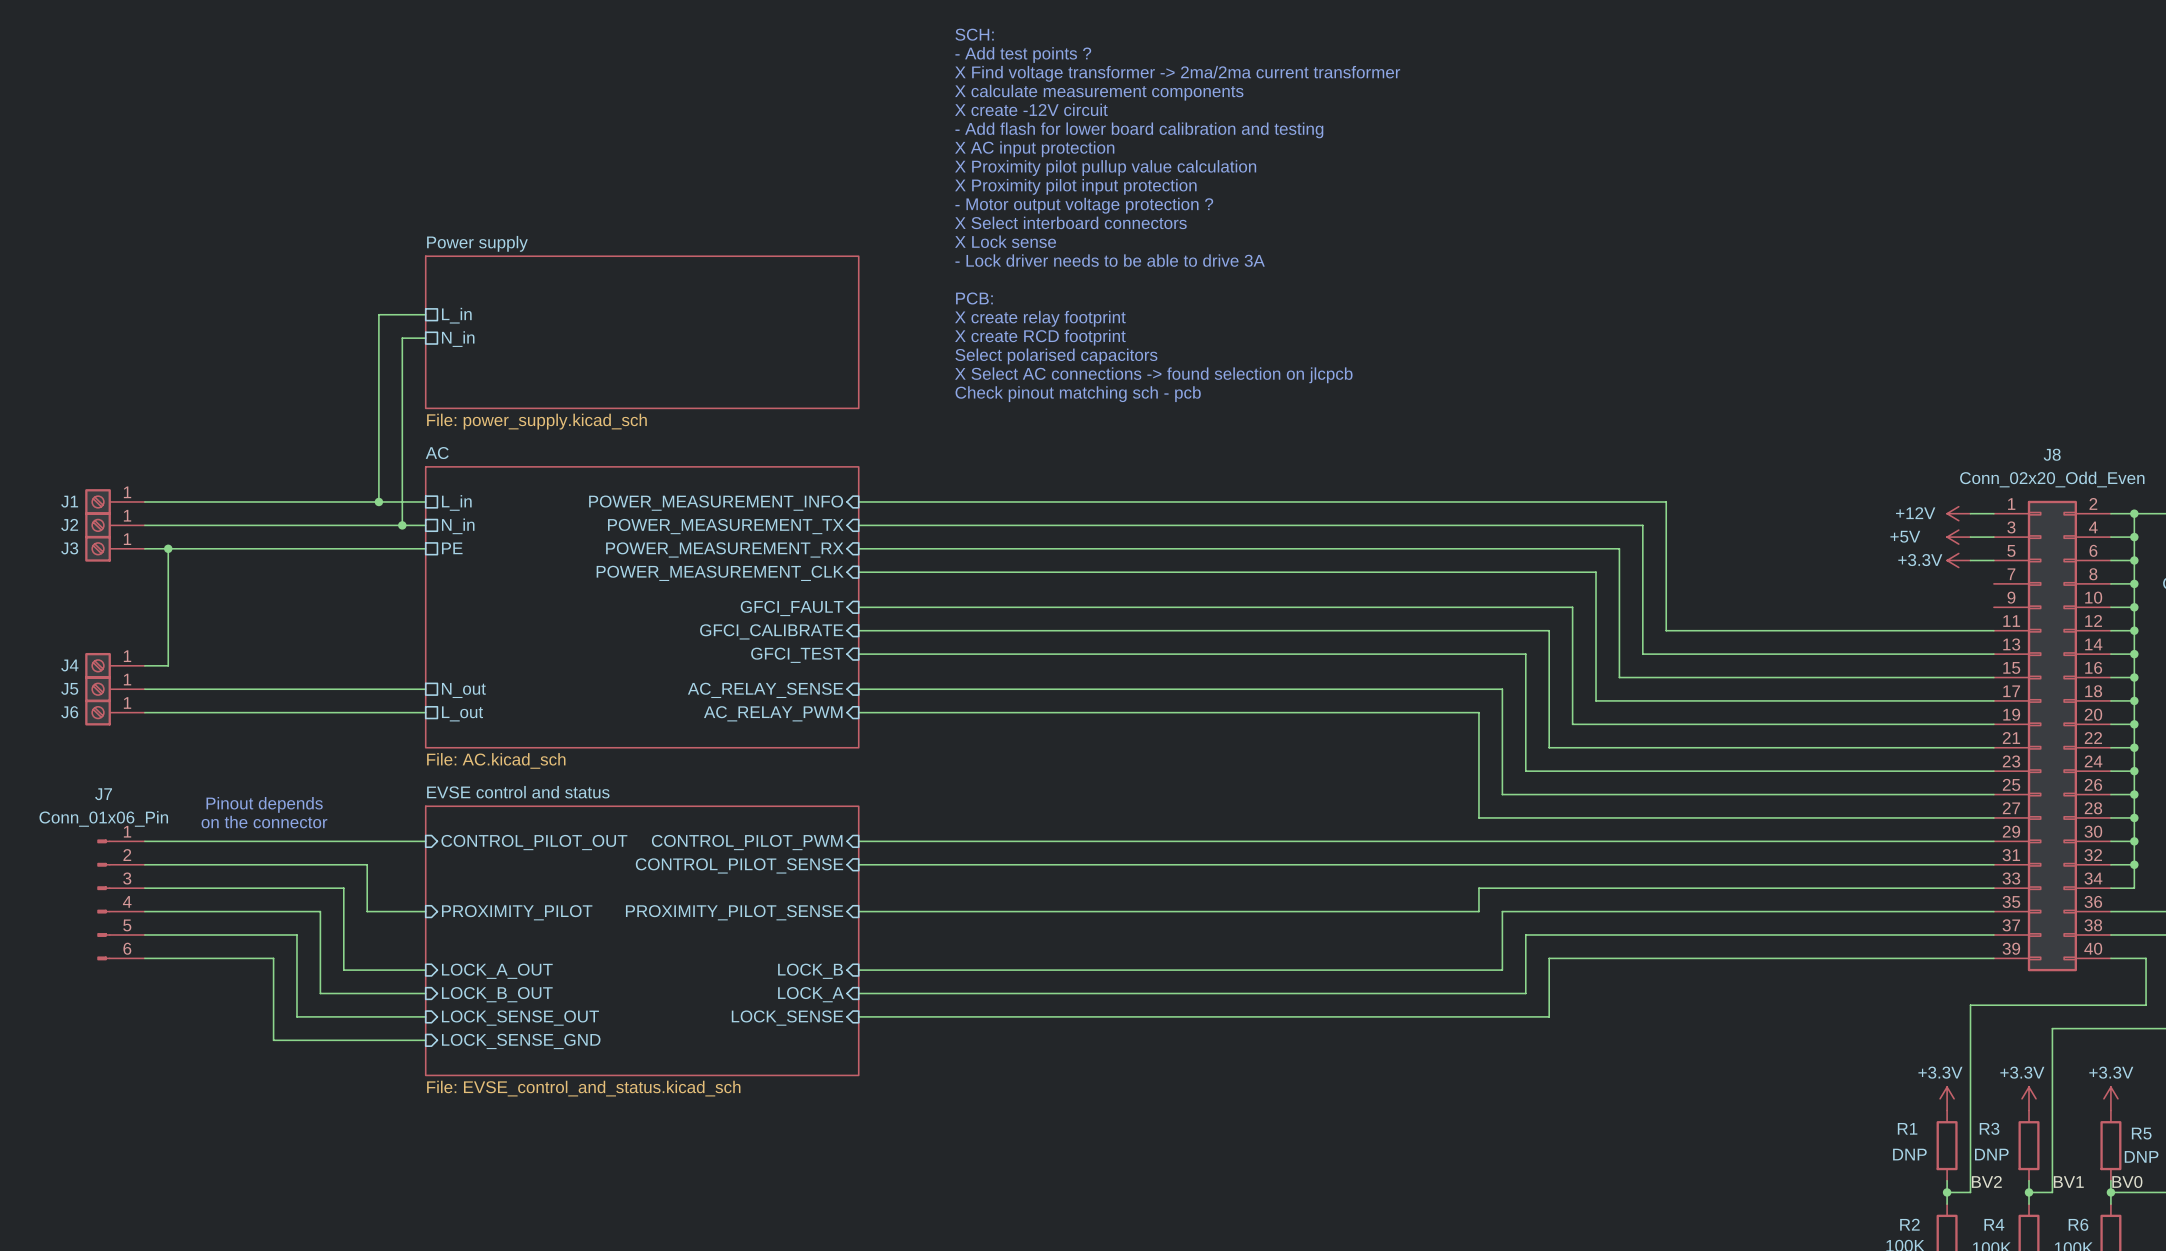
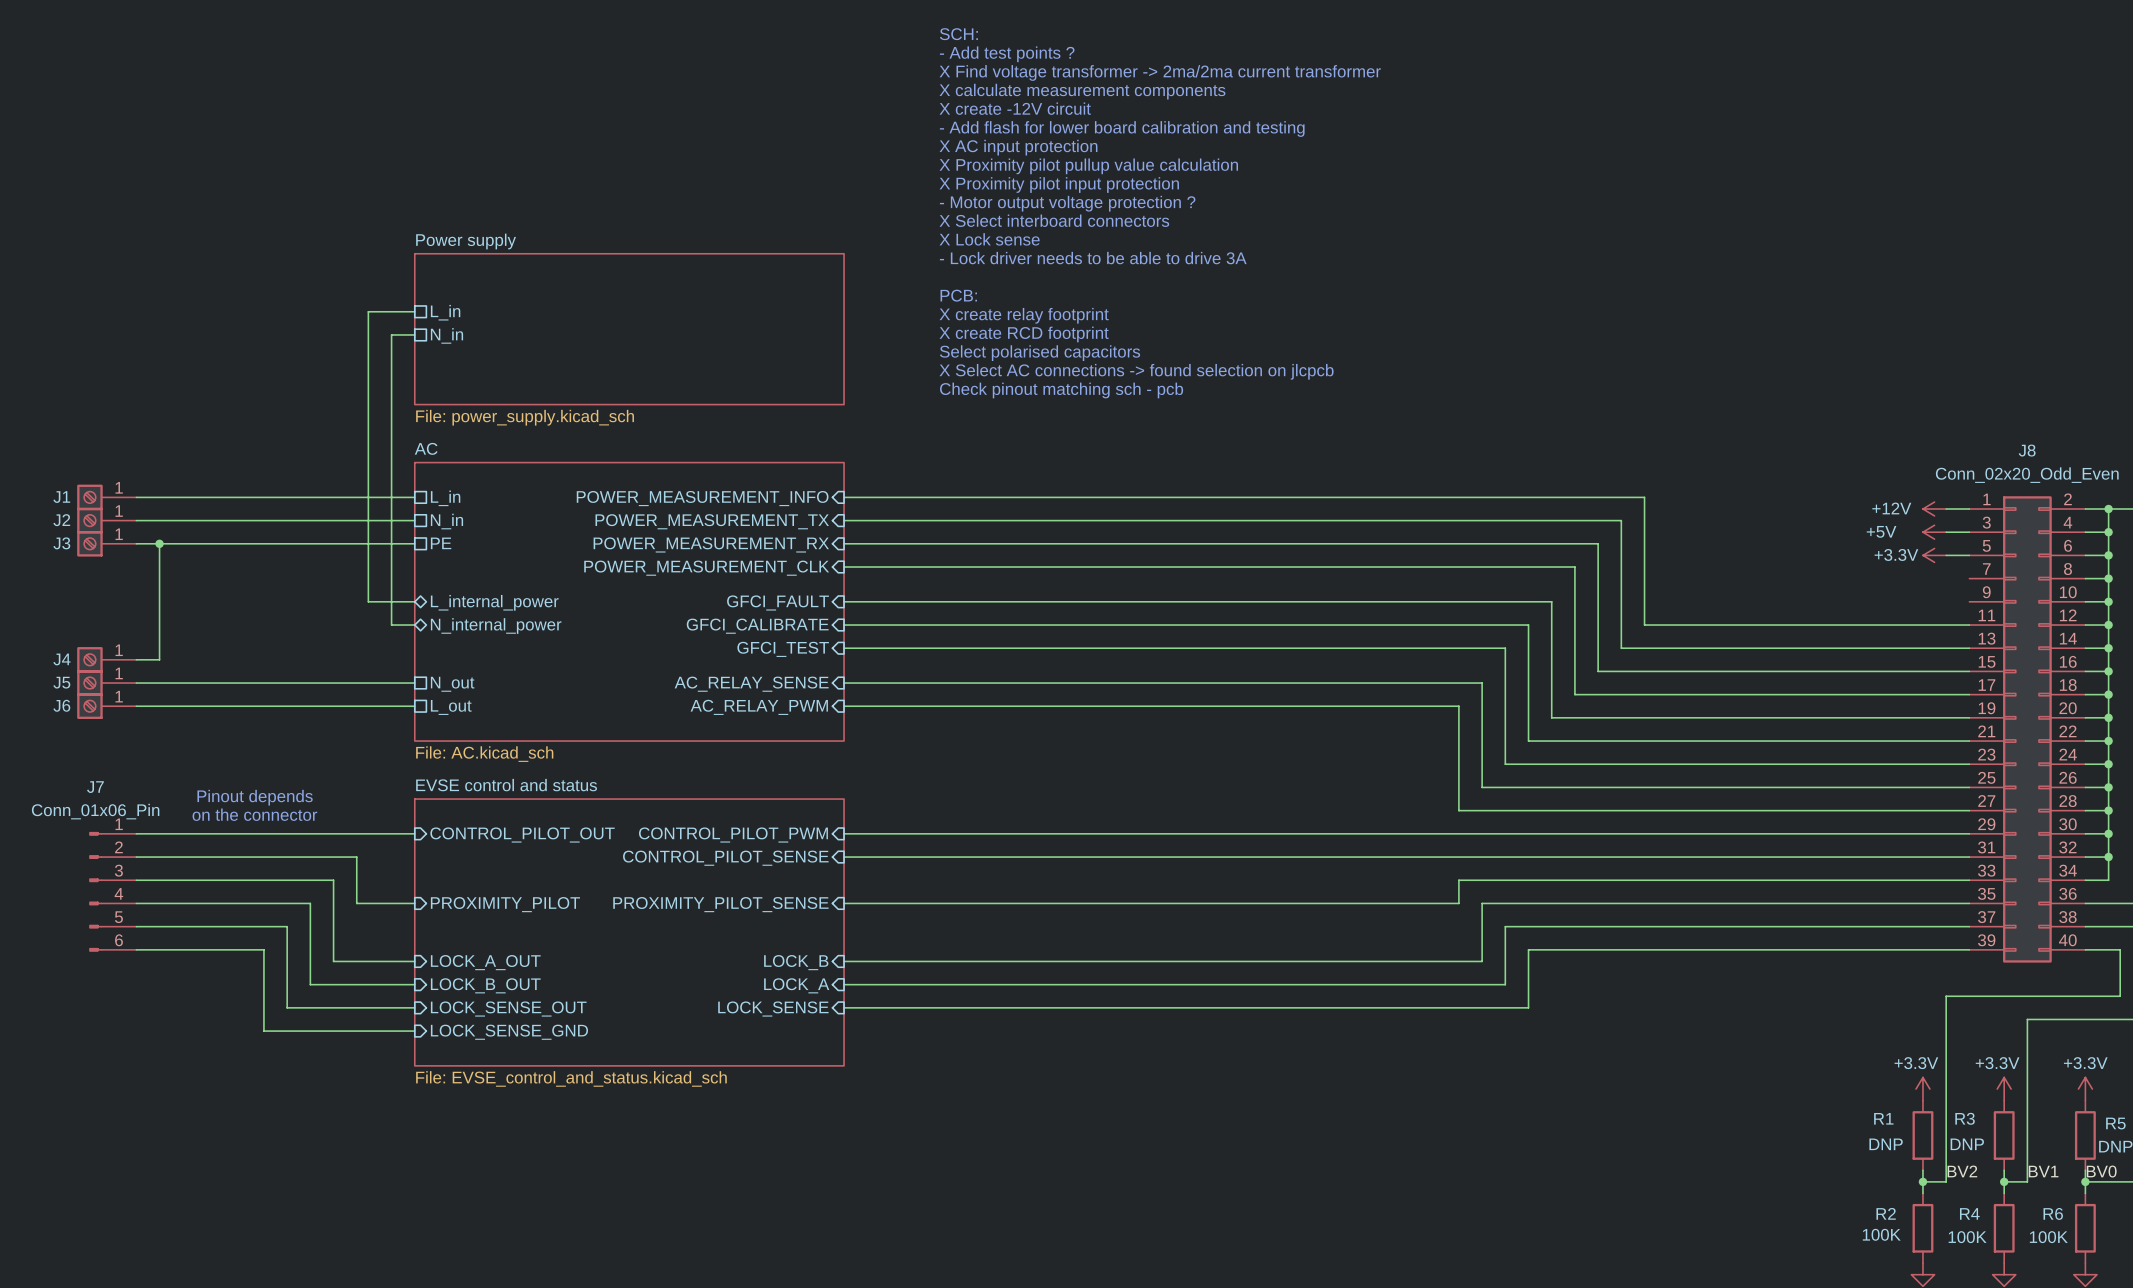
wire: none -> (368, 497) (368, 601) (414, 601)
junction: (378, 501) -> none
wire: none -> (391, 520) (391, 625) (414, 625)
junction: (402, 525) -> none
sheet pin: none -> L_internal_power (494, 602)
sheet pin: none -> N_internal_power (496, 626)

